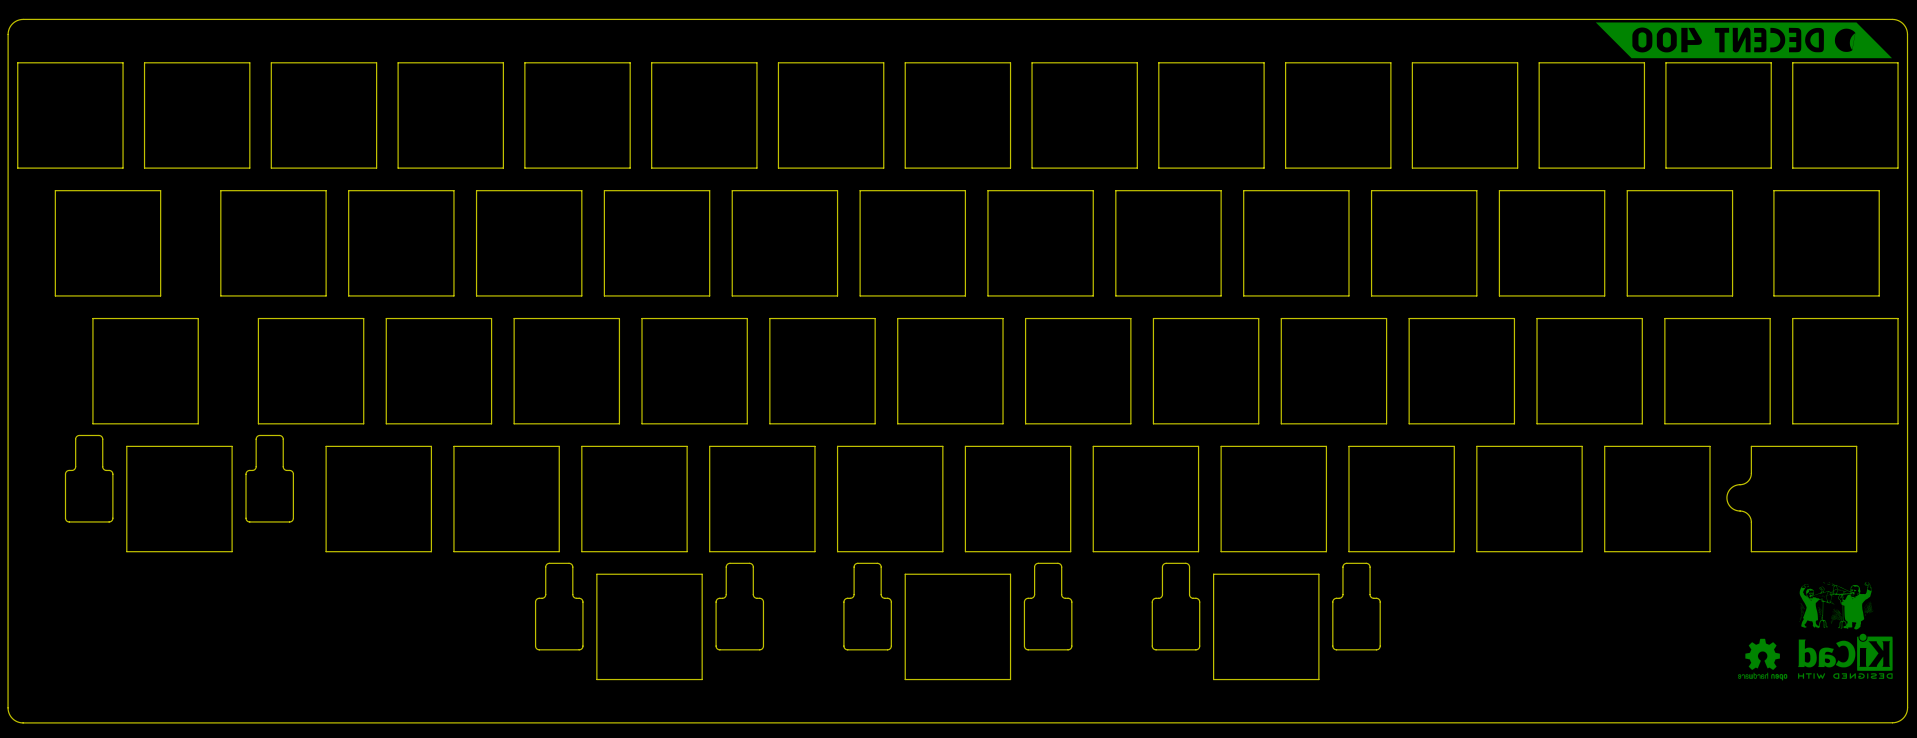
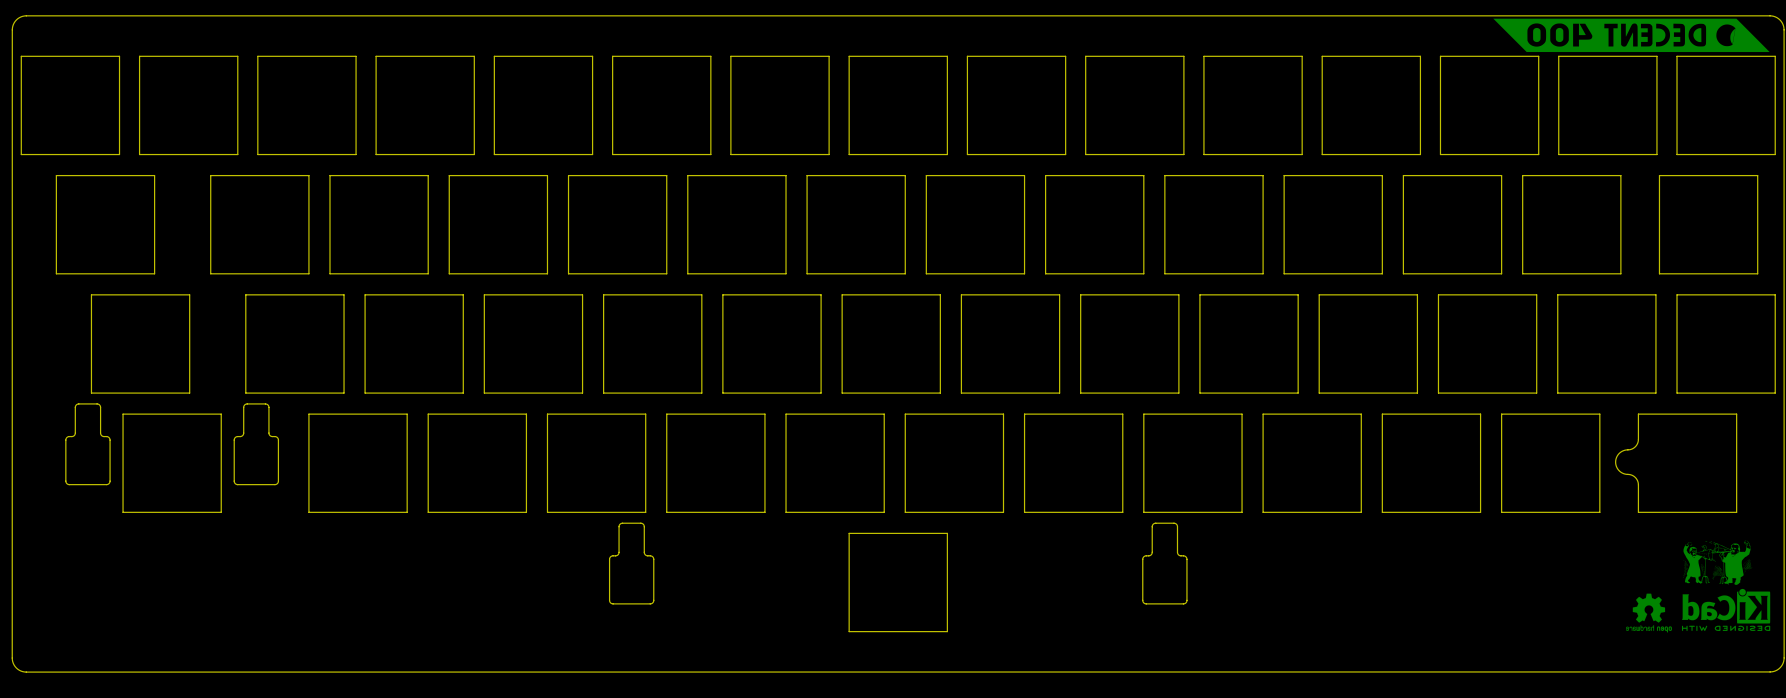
drawing: [535, 563, 764, 680] -> none
drawing shape: [843, 563, 1073, 680] -> [609, 523, 1188, 633]
drawing: [1152, 563, 1381, 680] -> none

